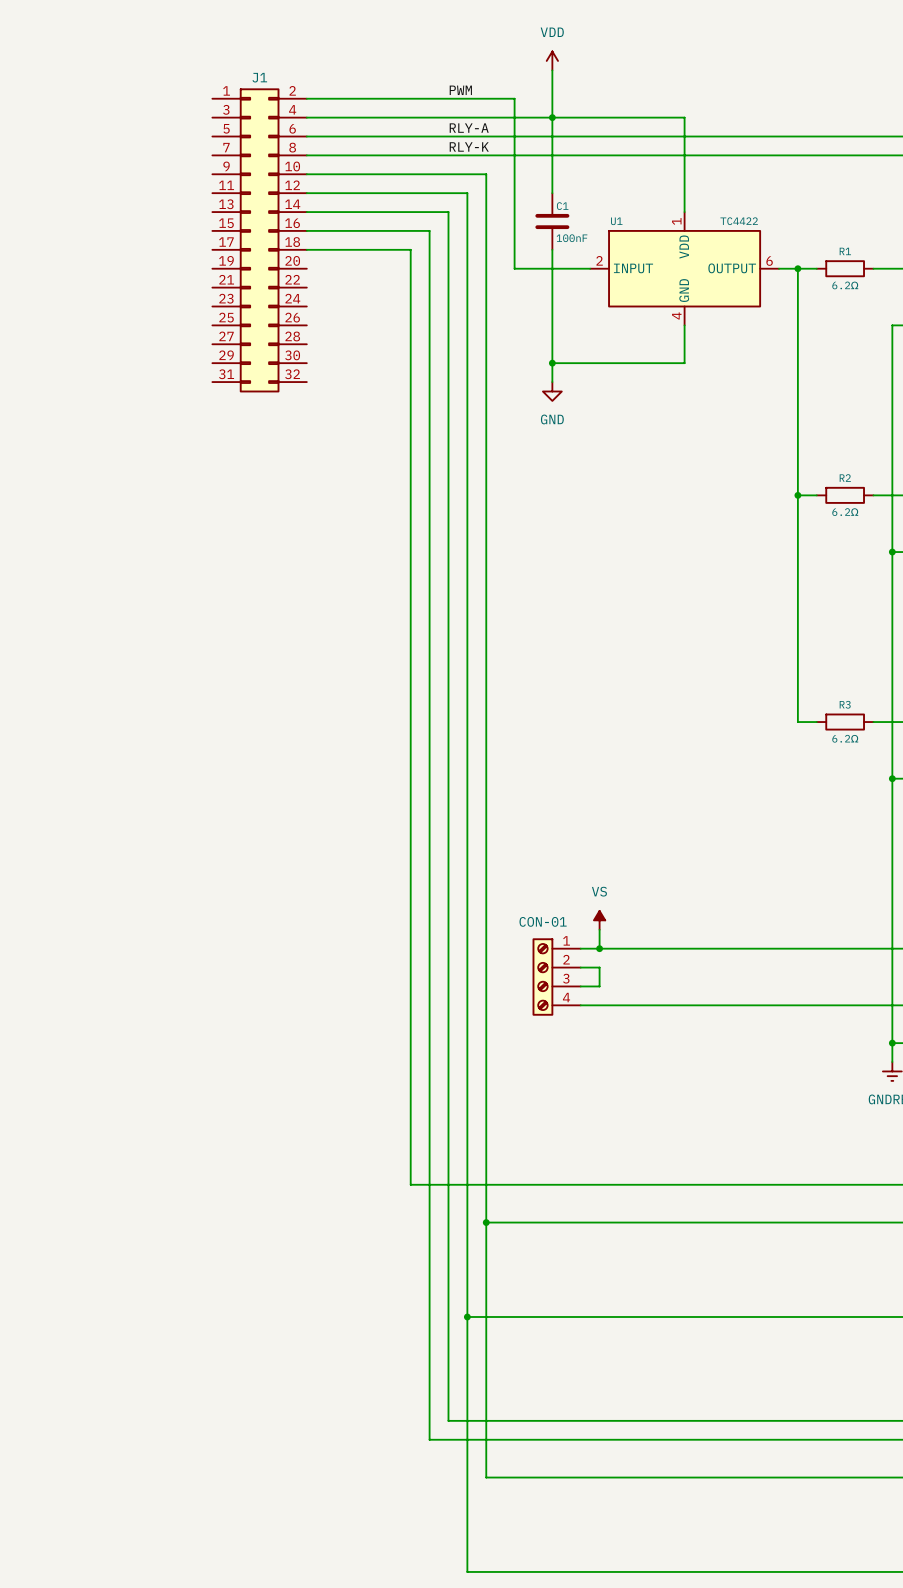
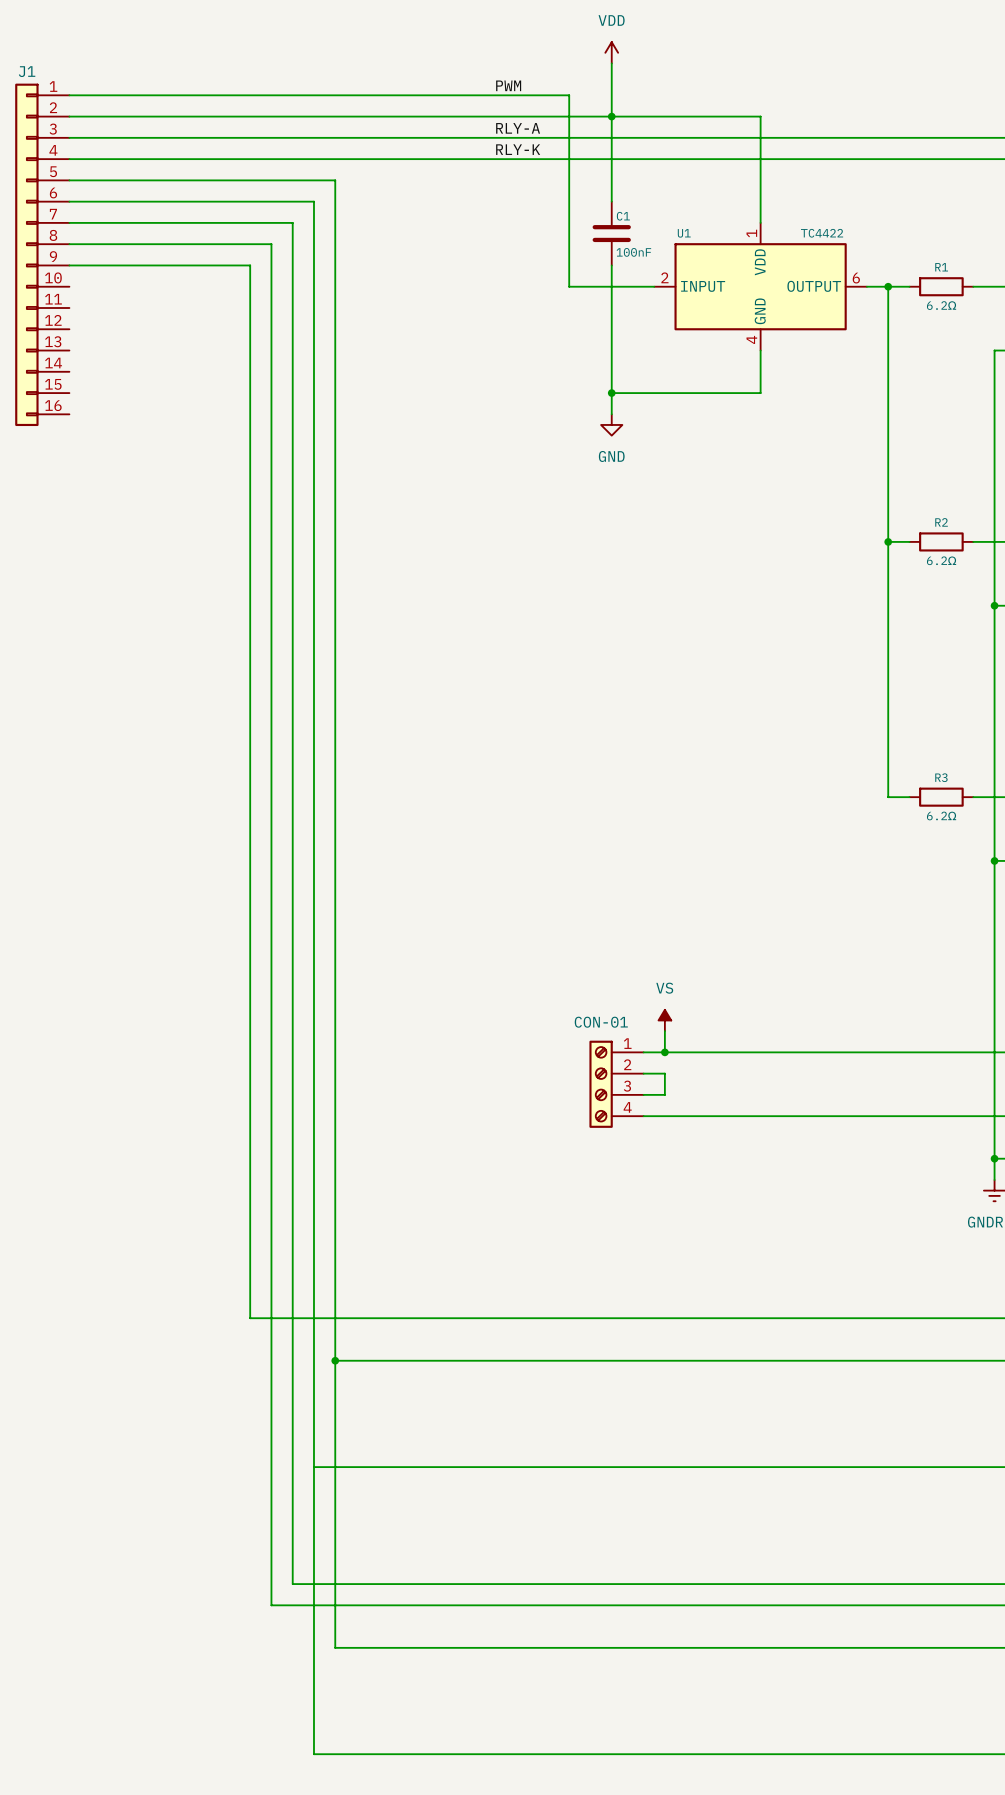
J1 symbol: [212, 88, 307, 393] -> [15, 83, 70, 427]
wire: none -> (69, 95) (335, 95)
wire: none -> (69, 116) (335, 116)
wire: none -> (69, 137) (335, 137)
wire: none -> (69, 159) (335, 159)
wire: (306, 174) (486, 174) (486, 1477) -> (69, 180) (335, 180) (335, 1647) (537, 1647)
wire: (306, 193) (467, 193) (467, 1571) -> (69, 201) (313, 201) (313, 1754) (516, 1754)
wire: (306, 212) (448, 212) (448, 1420) -> (69, 222) (292, 222) (292, 1584) (494, 1584)
wire: (306, 230) (429, 230) (429, 1439) -> (69, 244) (271, 244) (271, 1605) (473, 1605)
wire: (306, 249) (410, 249) (410, 1184) -> (69, 265) (250, 265) (250, 1318) (452, 1318)
wire: none -> (335, 1360) (537, 1360)
junction: none -> (335, 1360)
junction: (486, 1222) -> none
wire: none -> (313, 1467) (516, 1467)
junction: (467, 1316) -> none

